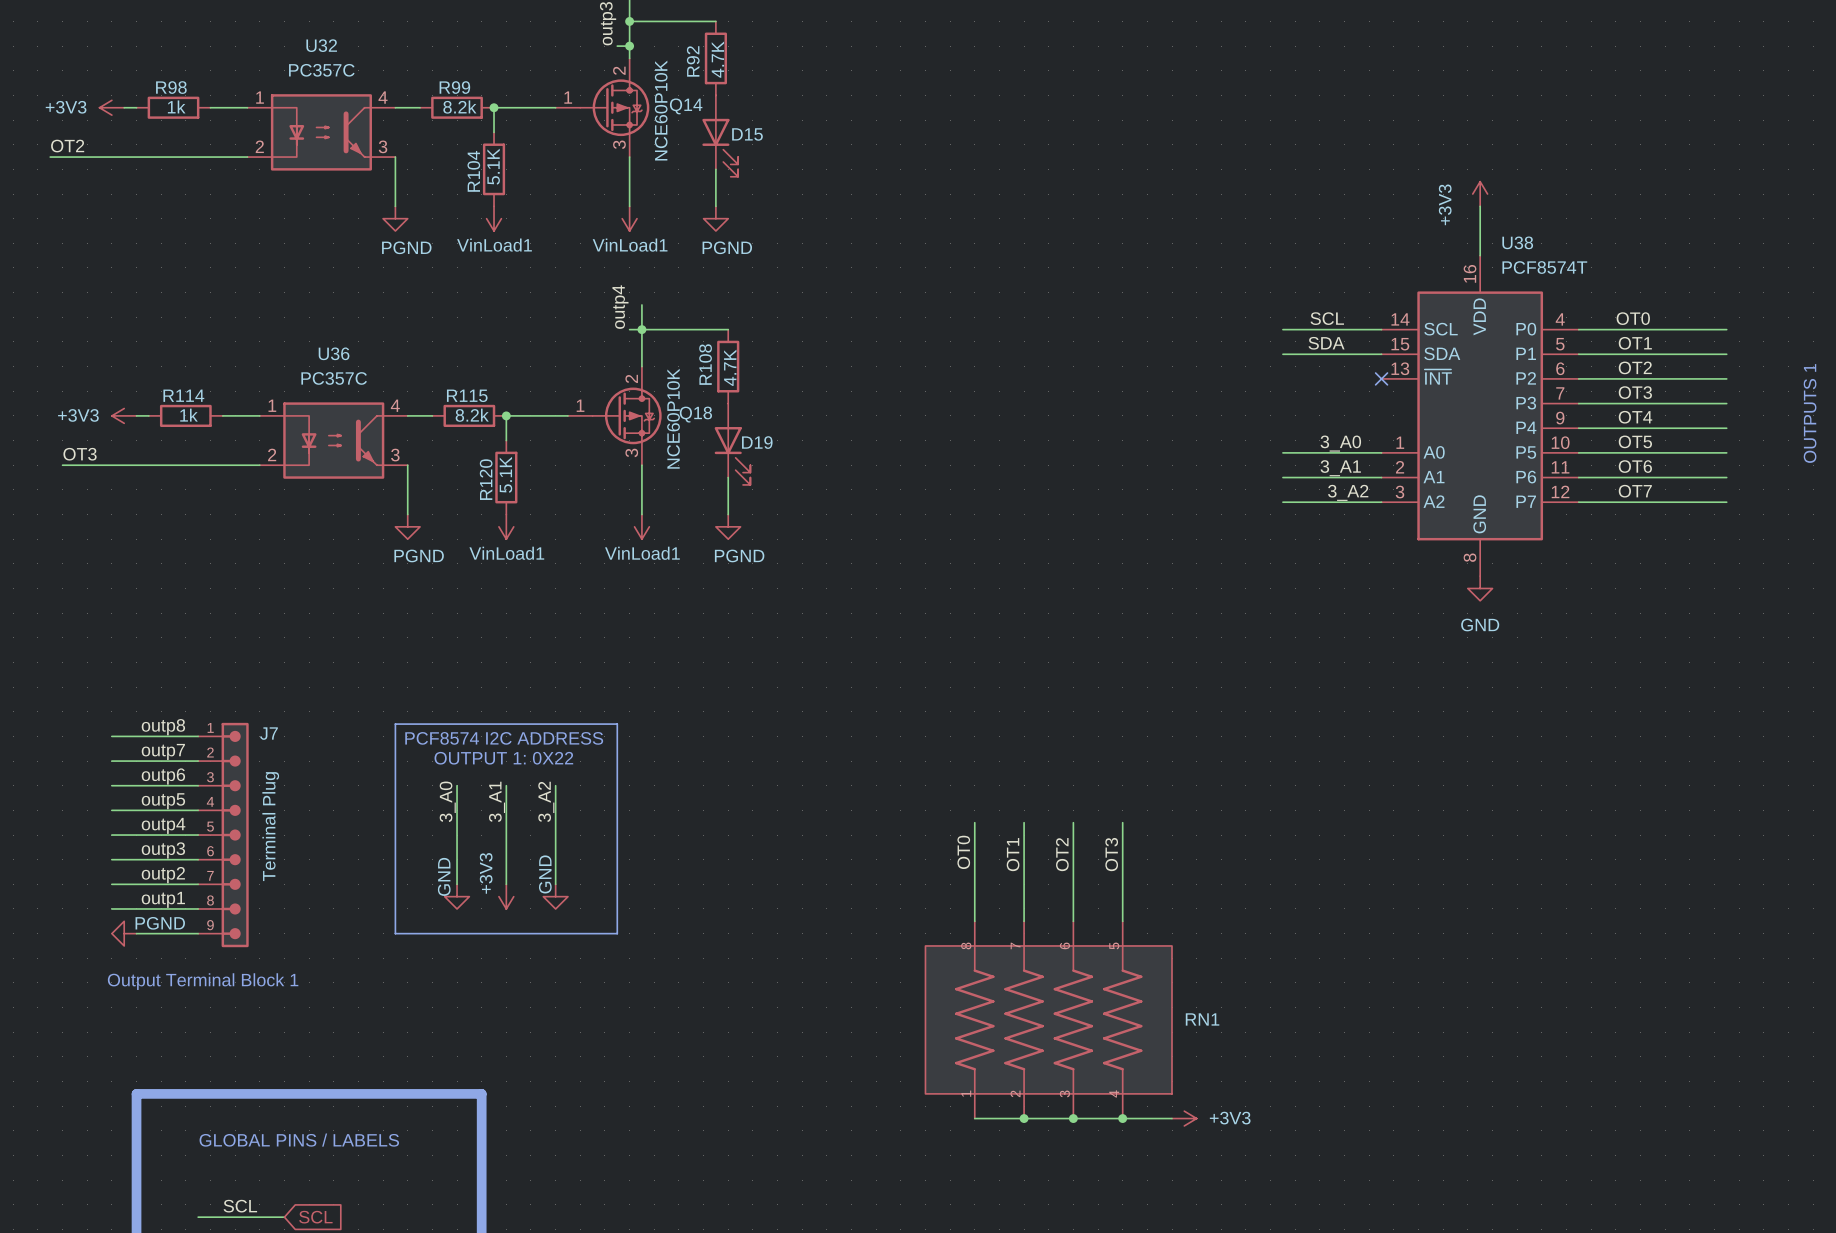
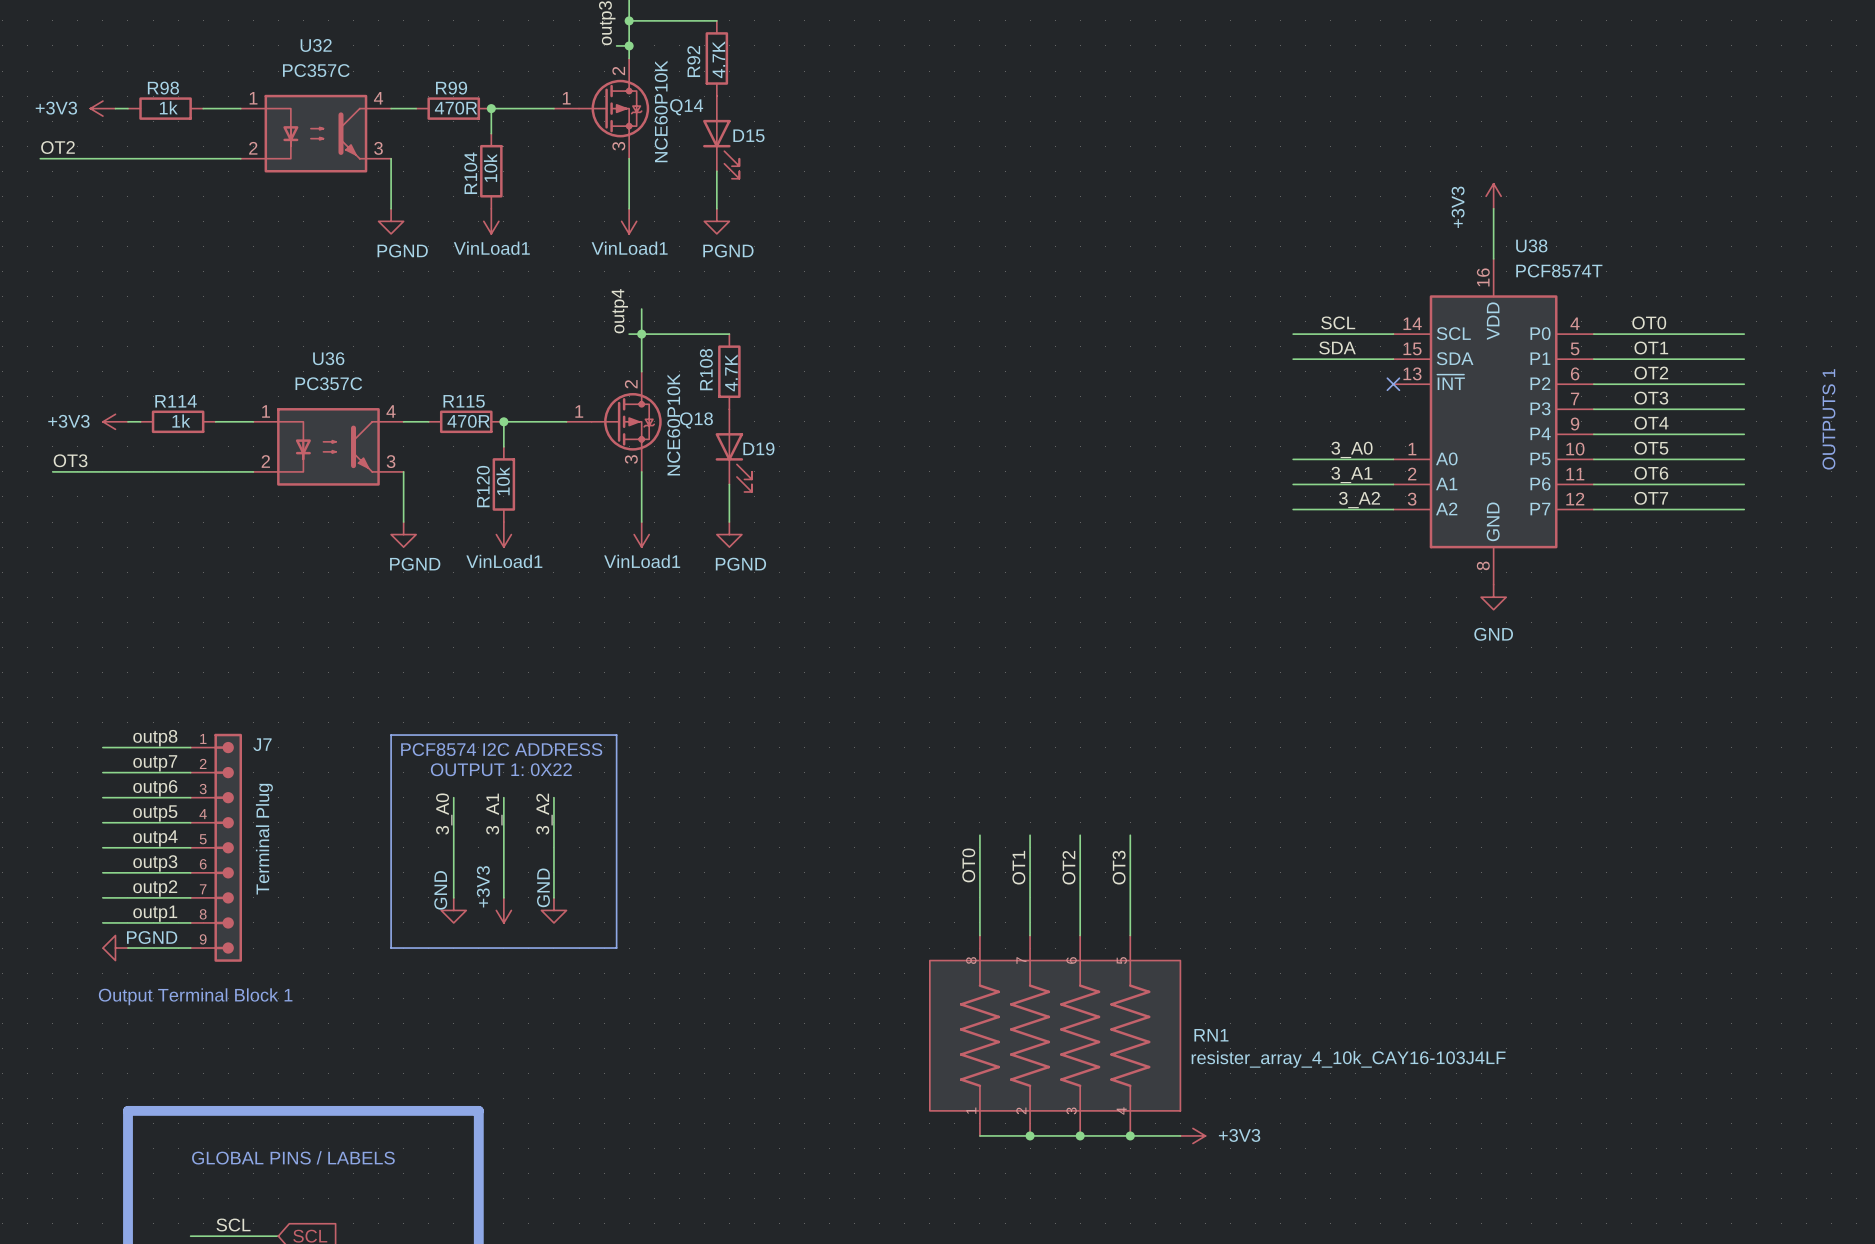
R99 value: 8.2k (459, 107) -> 470R (456, 108)
R104 value: 5.1K (493, 166) -> 10k (490, 168)
R115 value: 8.2k (472, 415) -> 470R (468, 421)
R120 value: 5.1K (505, 474) -> 10k (503, 481)
RN1 value: none -> resister_array_4_10k_CAY16-103J4LF (1348, 1059)

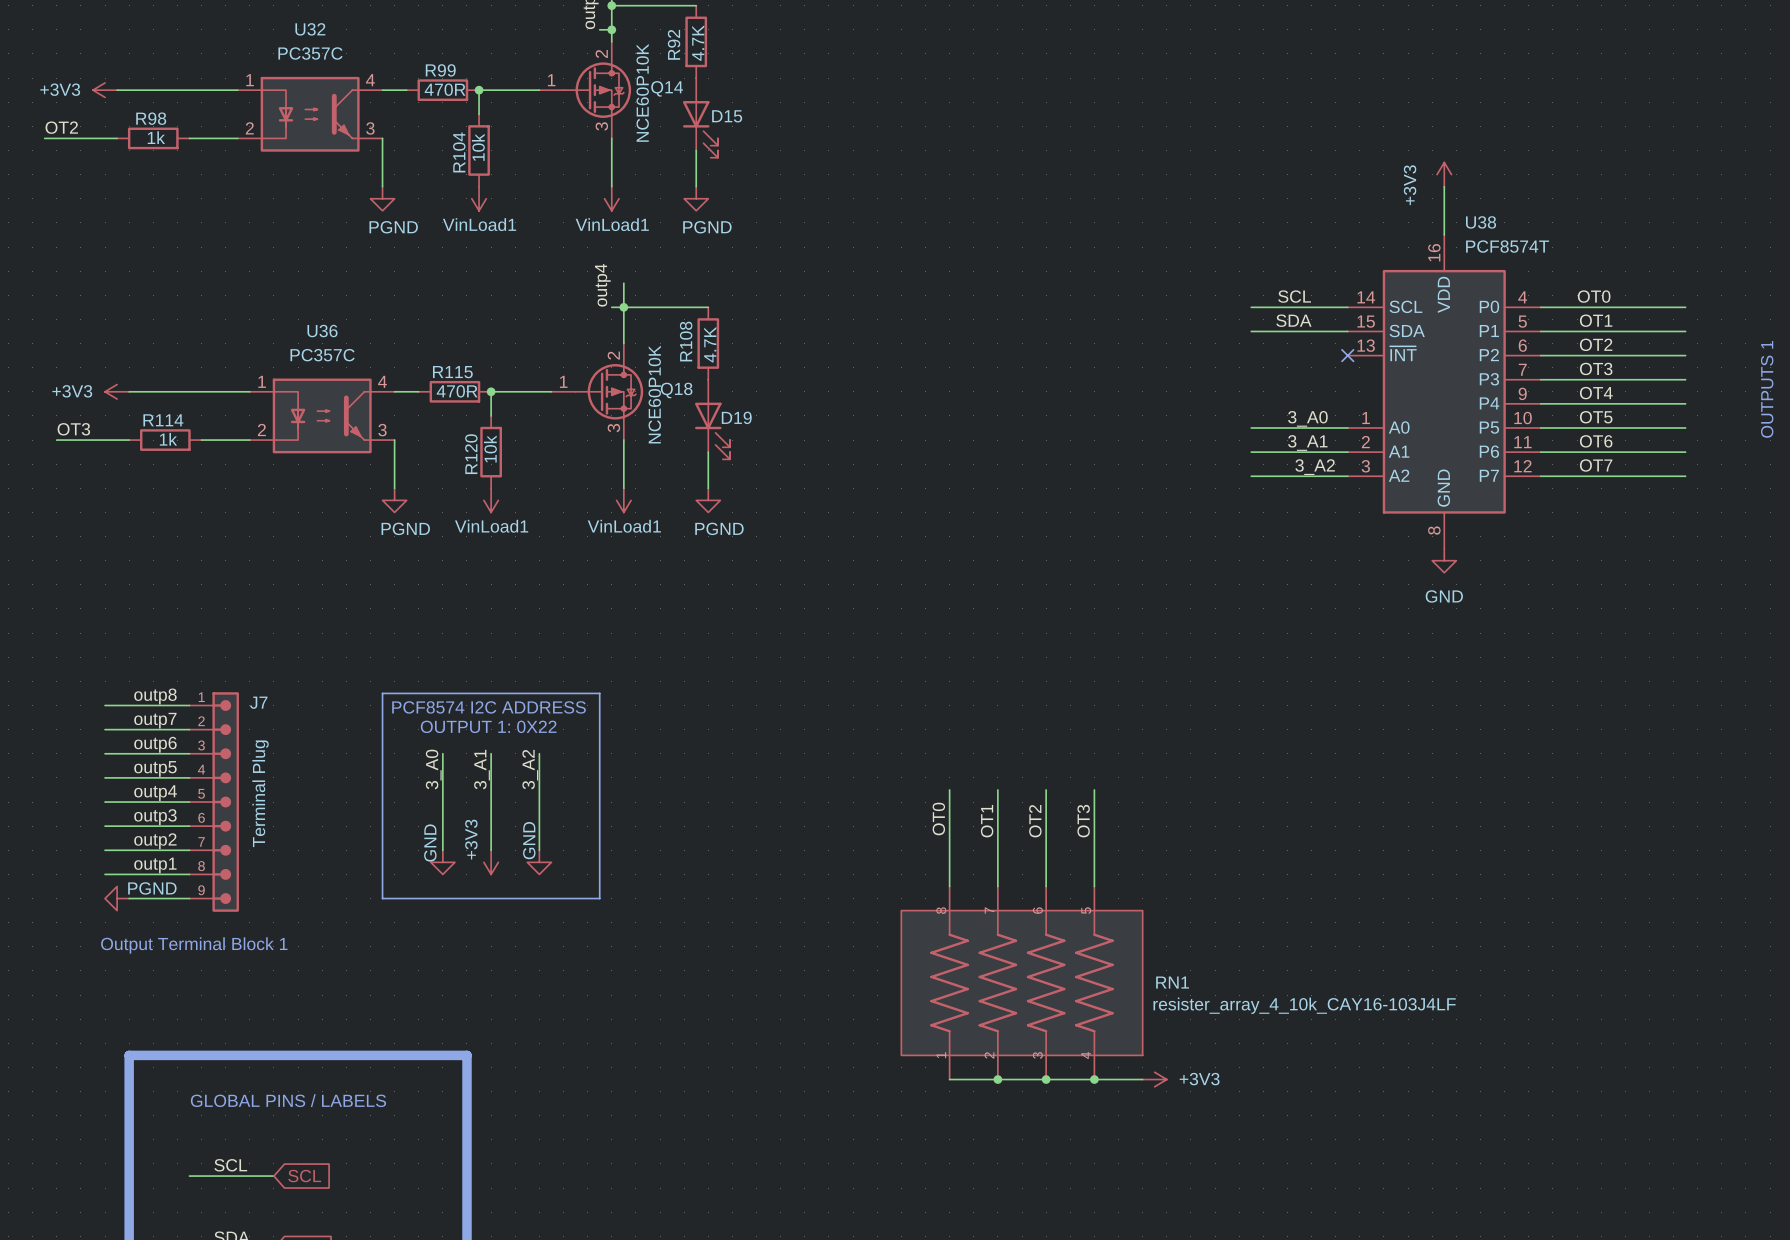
R98 position: (165, 108) -> (153, 138)
wire: (115, 158) (190, 158) -> (129, 90) (201, 90)
R114 position: (178, 421) -> (165, 440)
wire: (127, 471) (203, 471) -> (141, 391) (213, 391)

